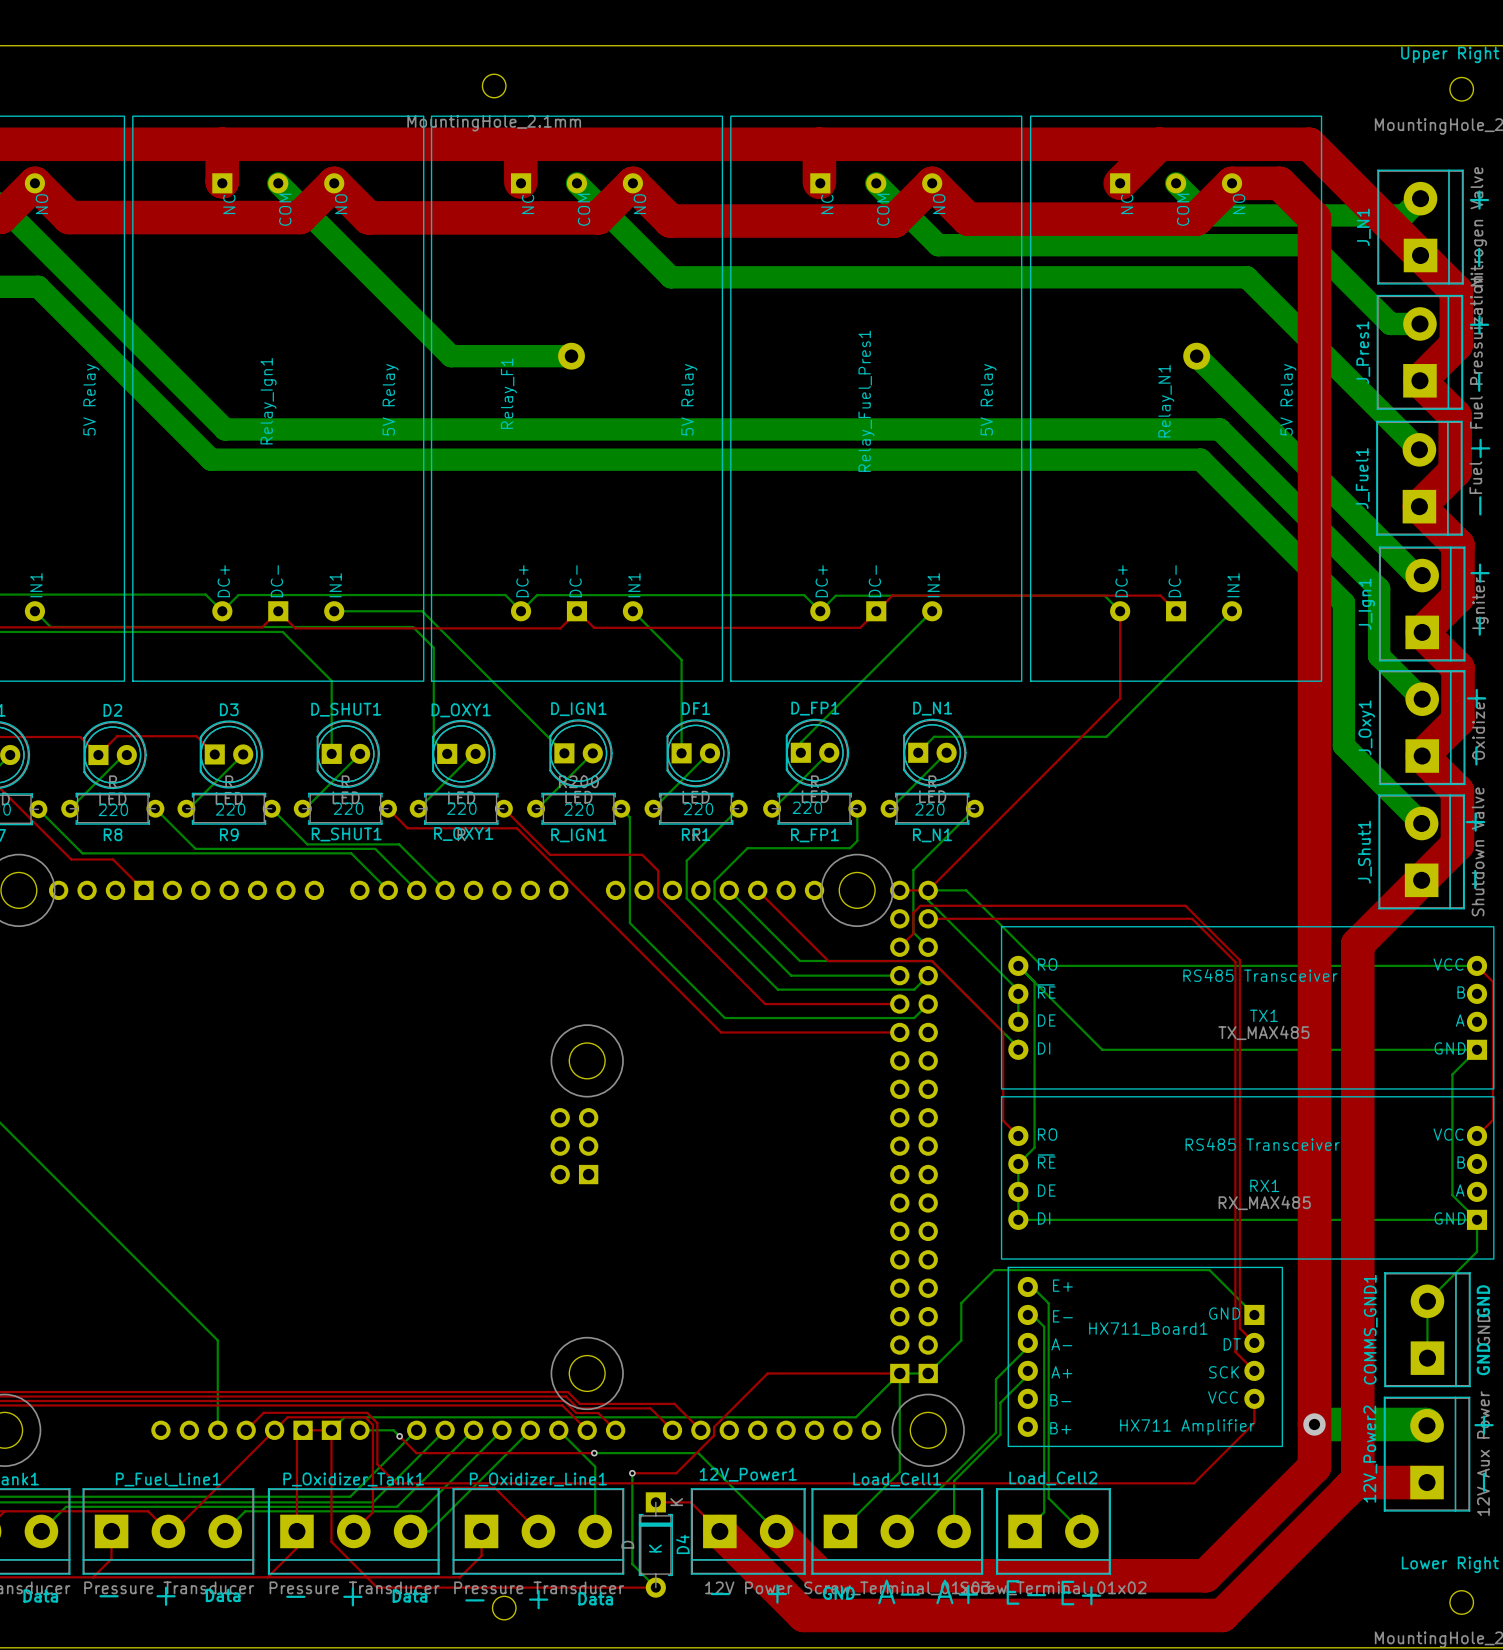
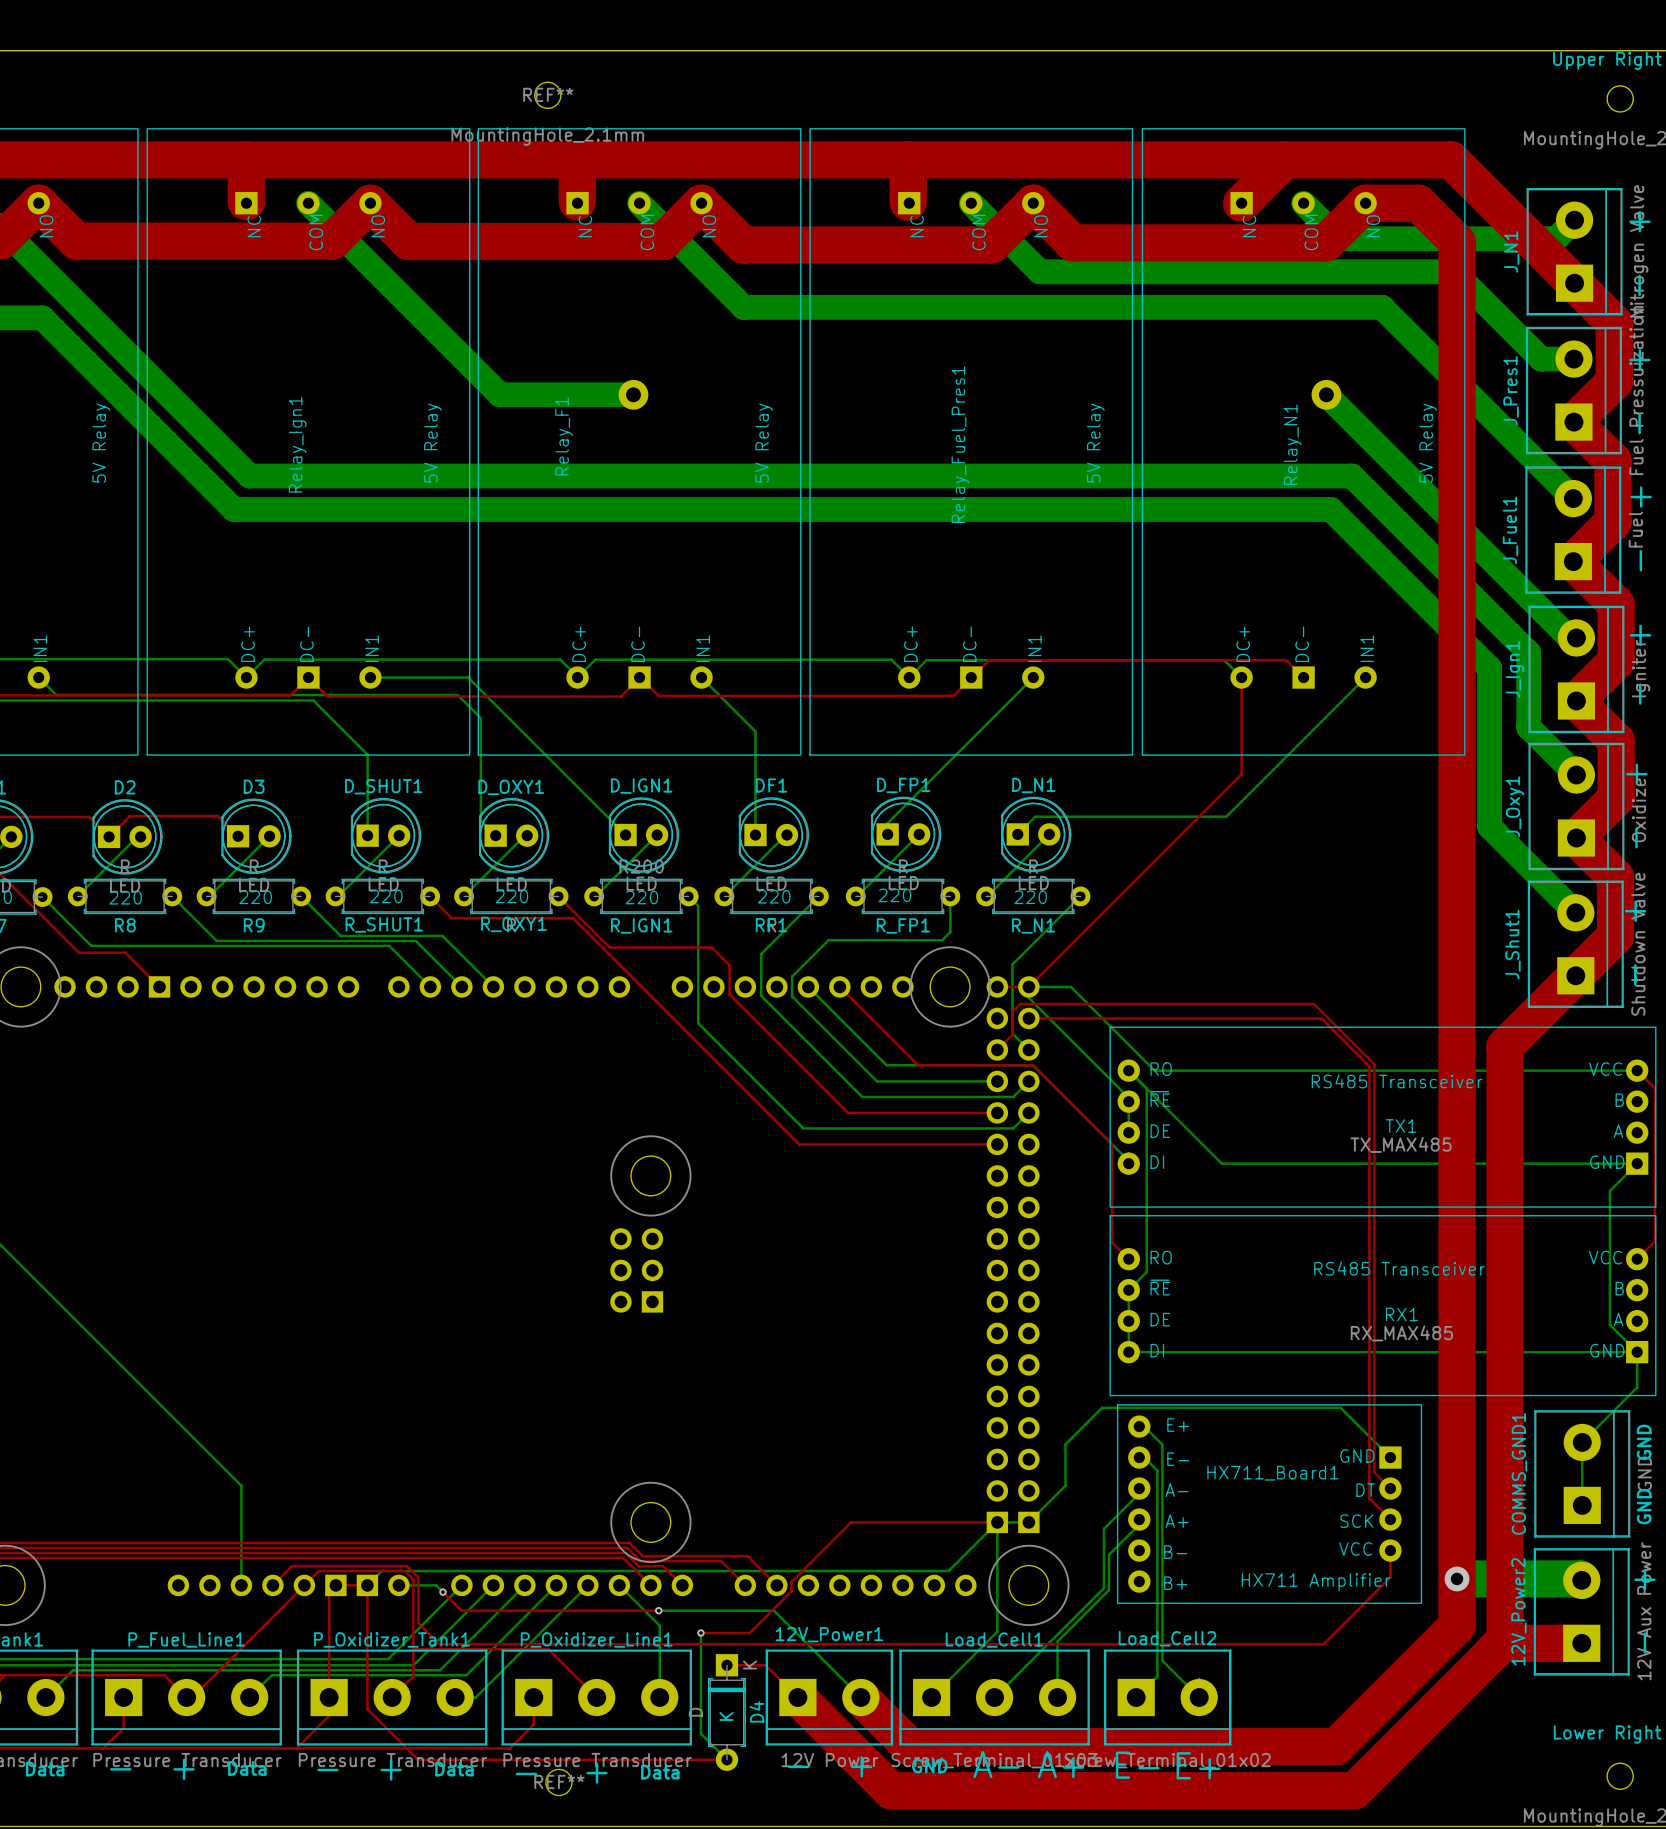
REF** name: none -> REF** (548, 94)
REF** name: none -> REF** (559, 1781)

